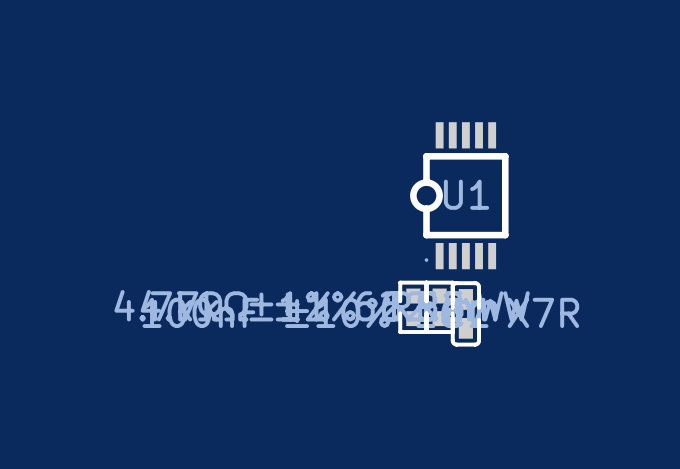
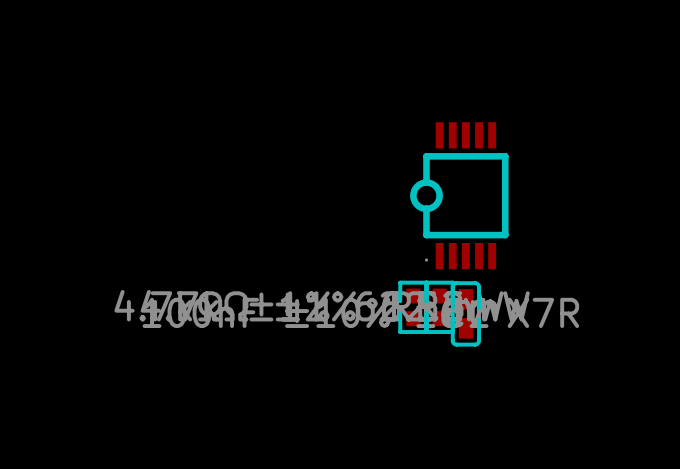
U1 name: U1 (466, 194) -> none

